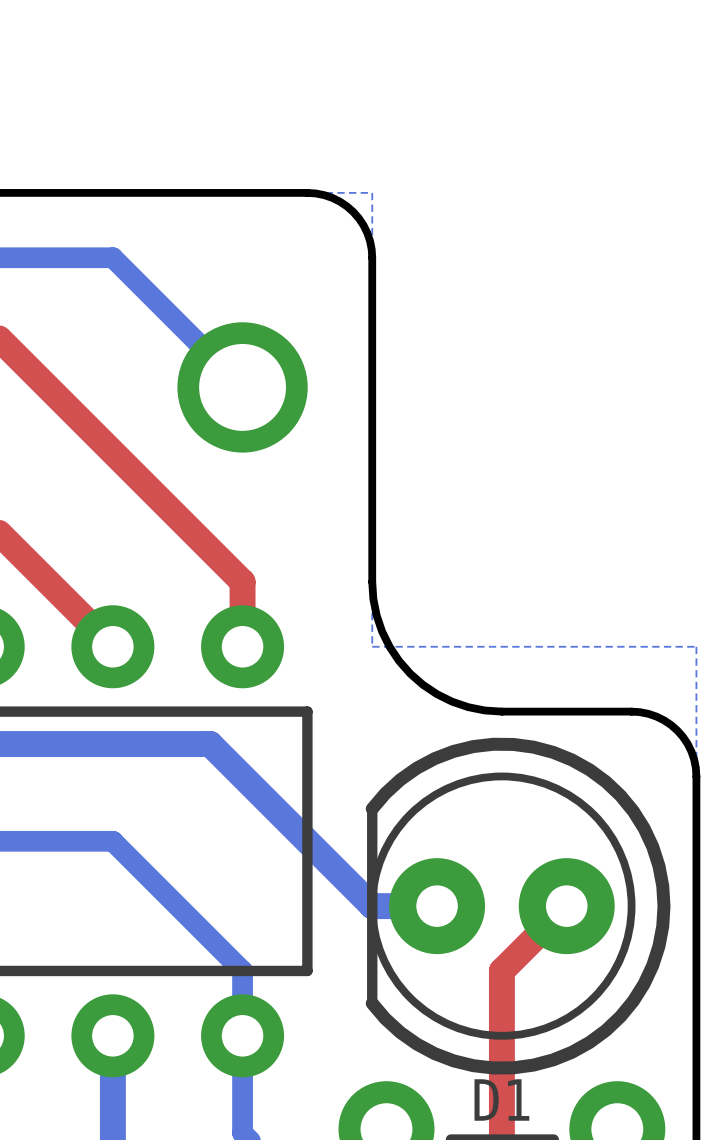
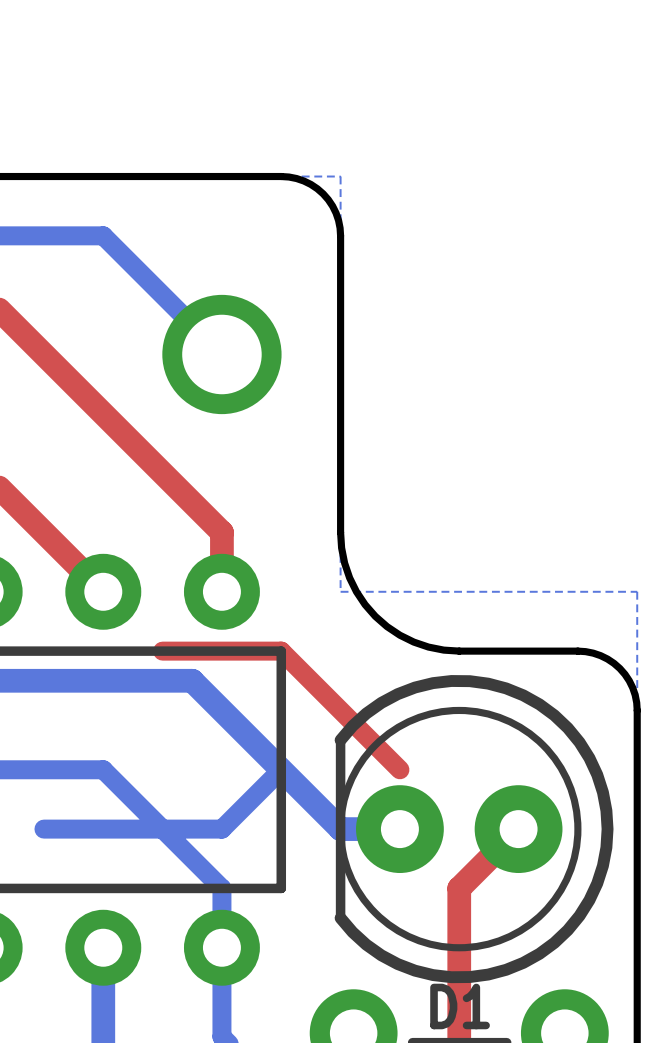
top track: none -> (162, 651) (281, 651) (399, 769)
bottom track: none -> (281, 769) (221, 829) (43, 829)

